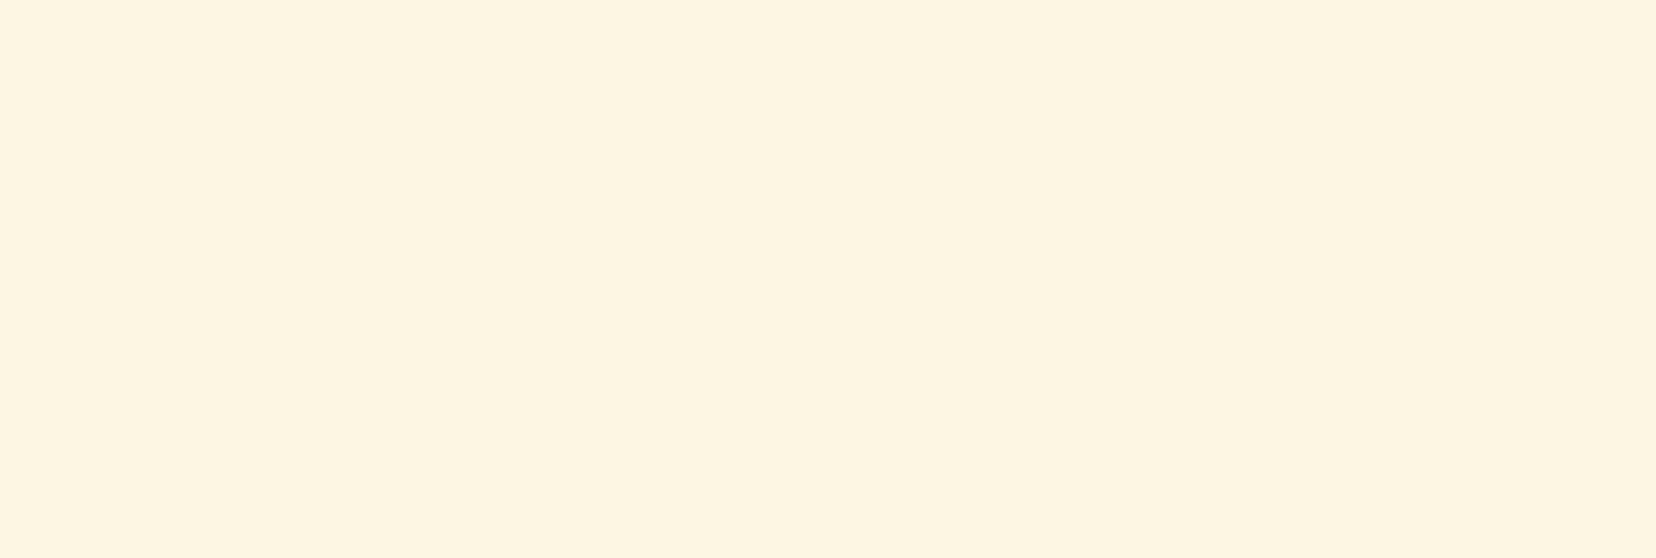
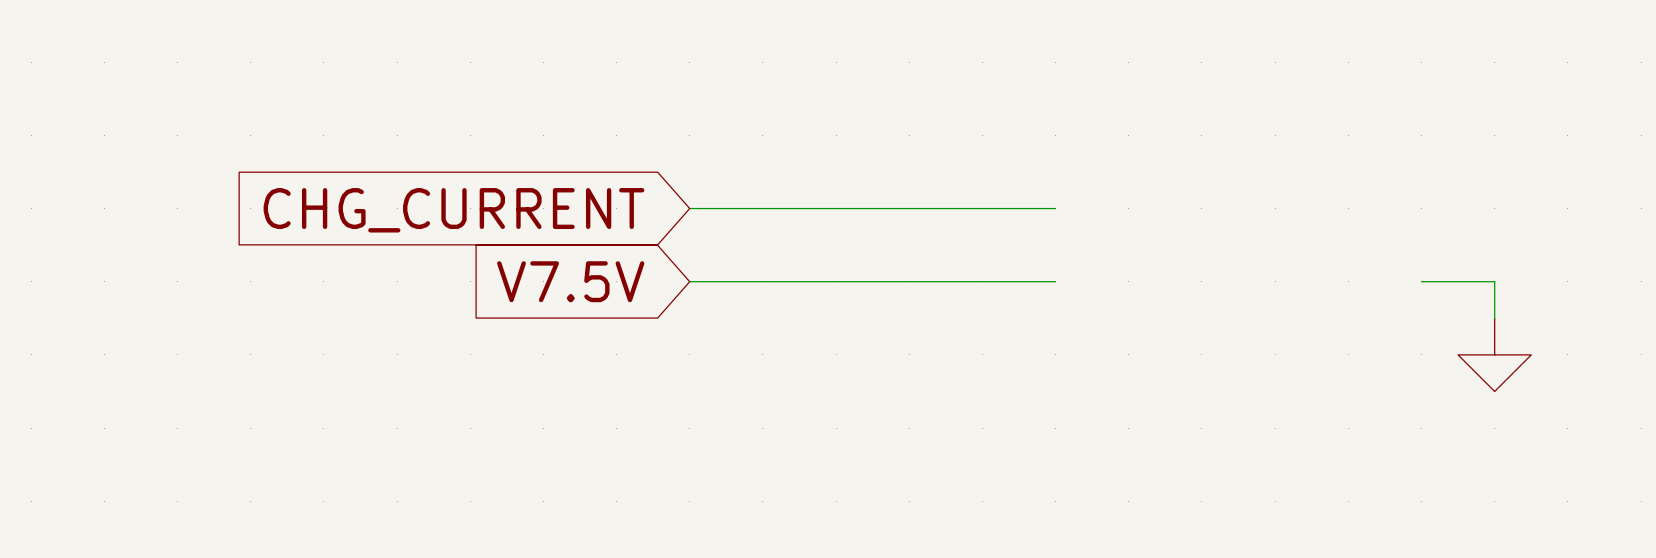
wire: none -> (689, 208) (1055, 208)
global label: none -> CHG_CURRENT (454, 210)
global label: none -> V7.5V (570, 281)
wire: none -> (689, 281) (1055, 281)
wire: none -> (1421, 281) (1494, 281) (1494, 318)
power symbol: none -> (1494, 354)

